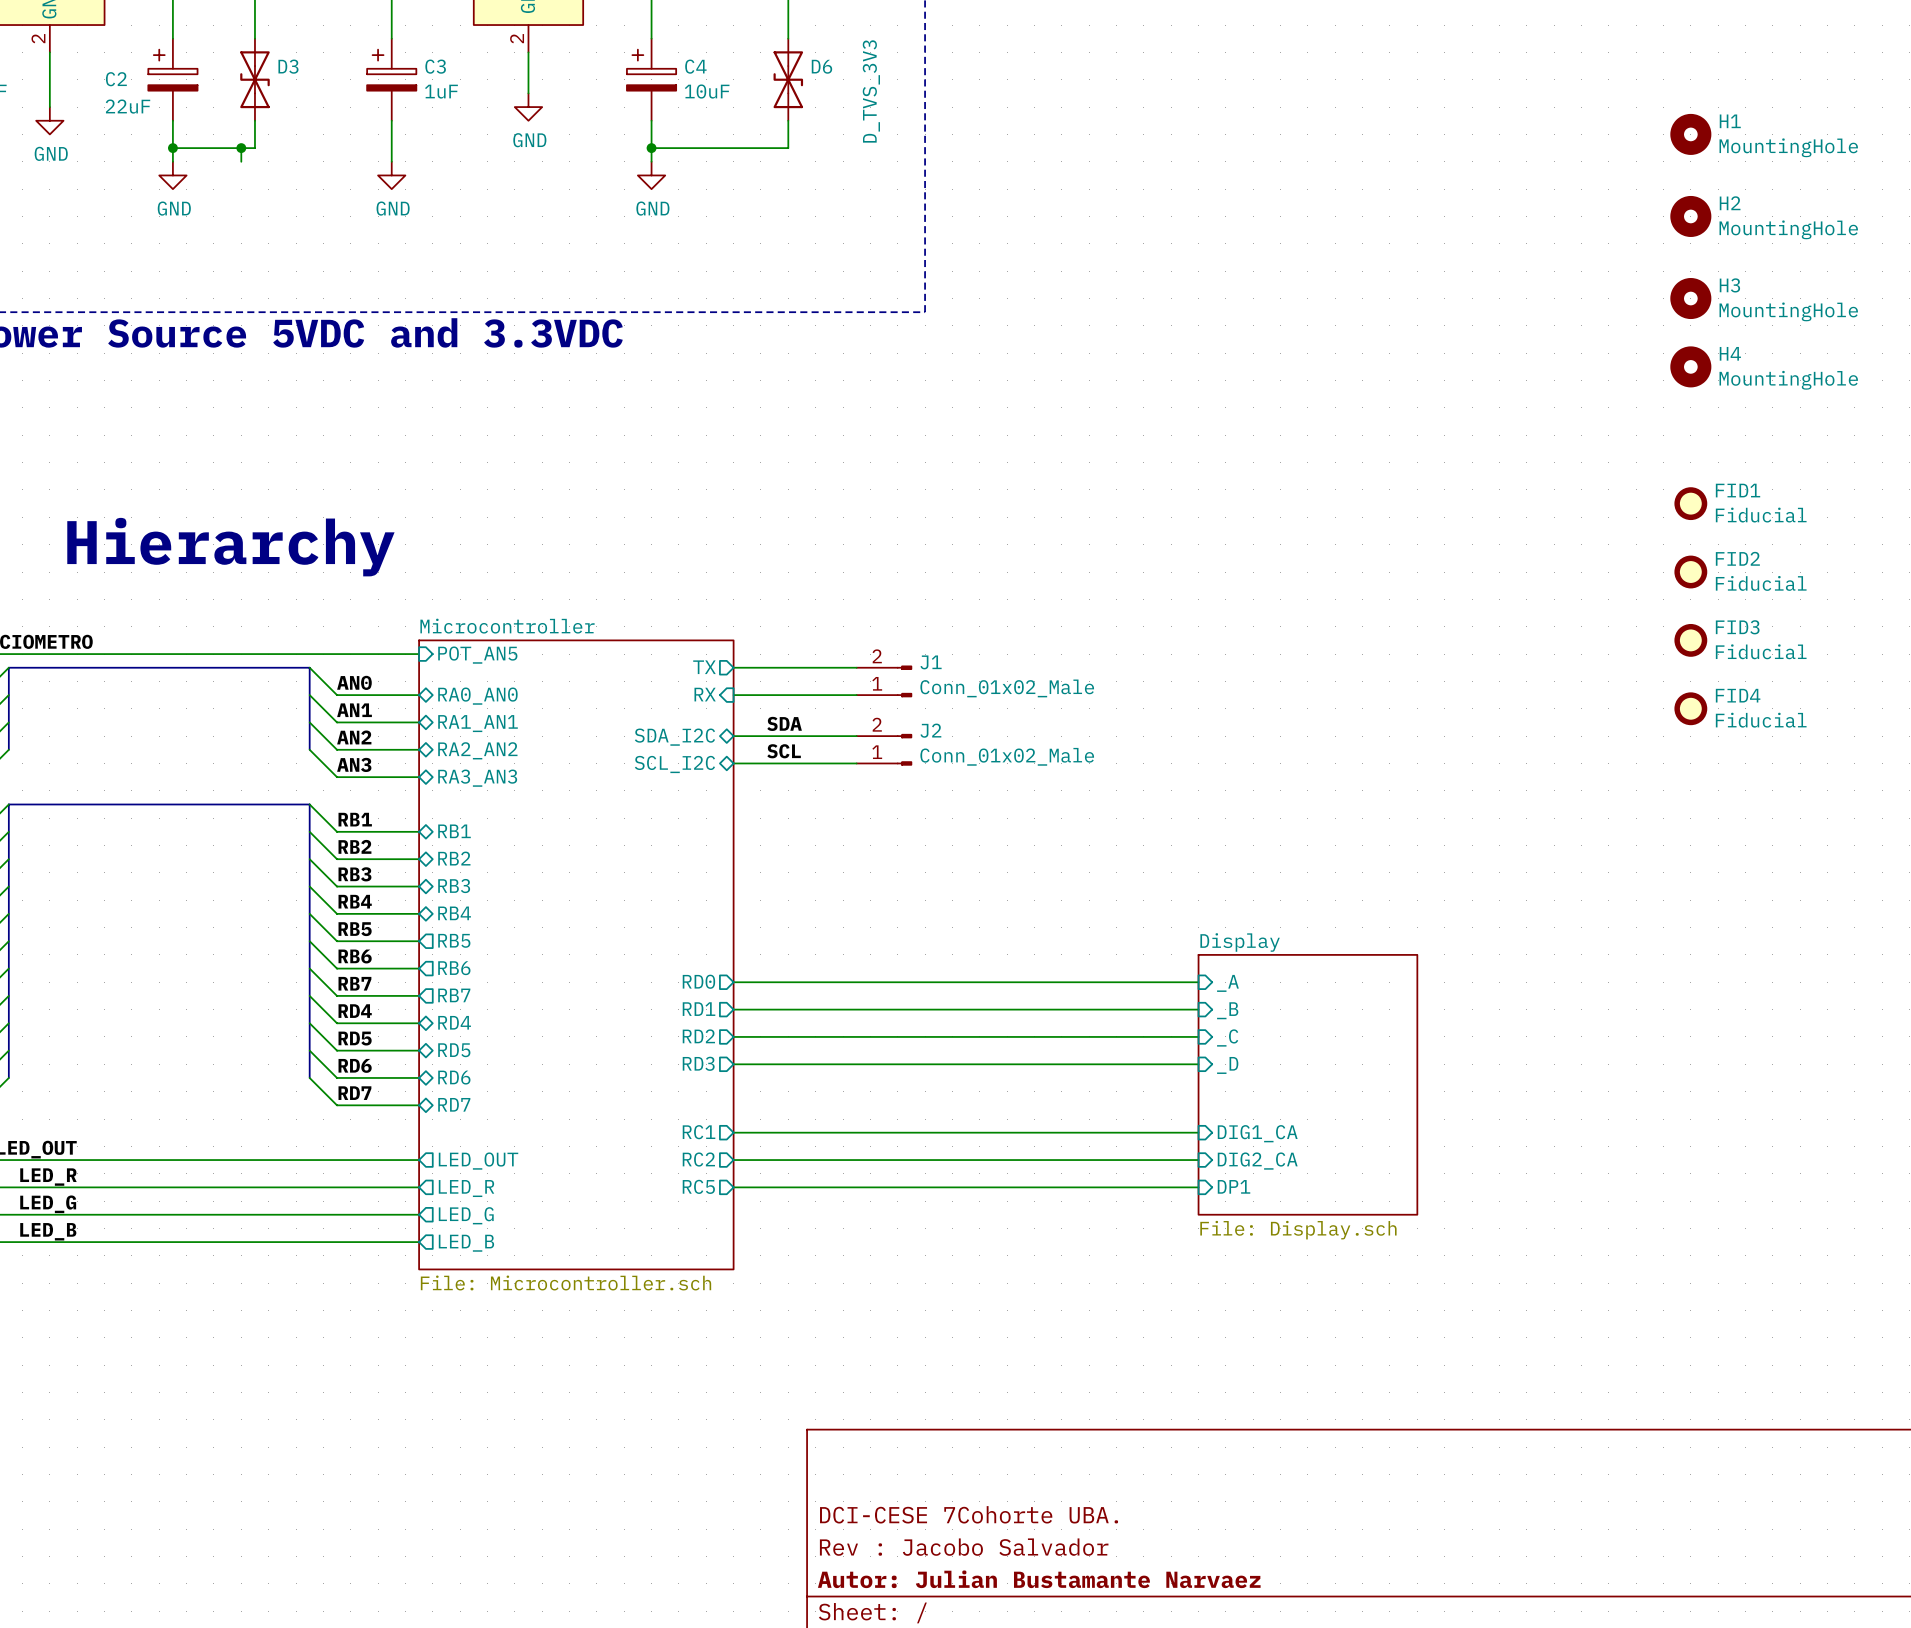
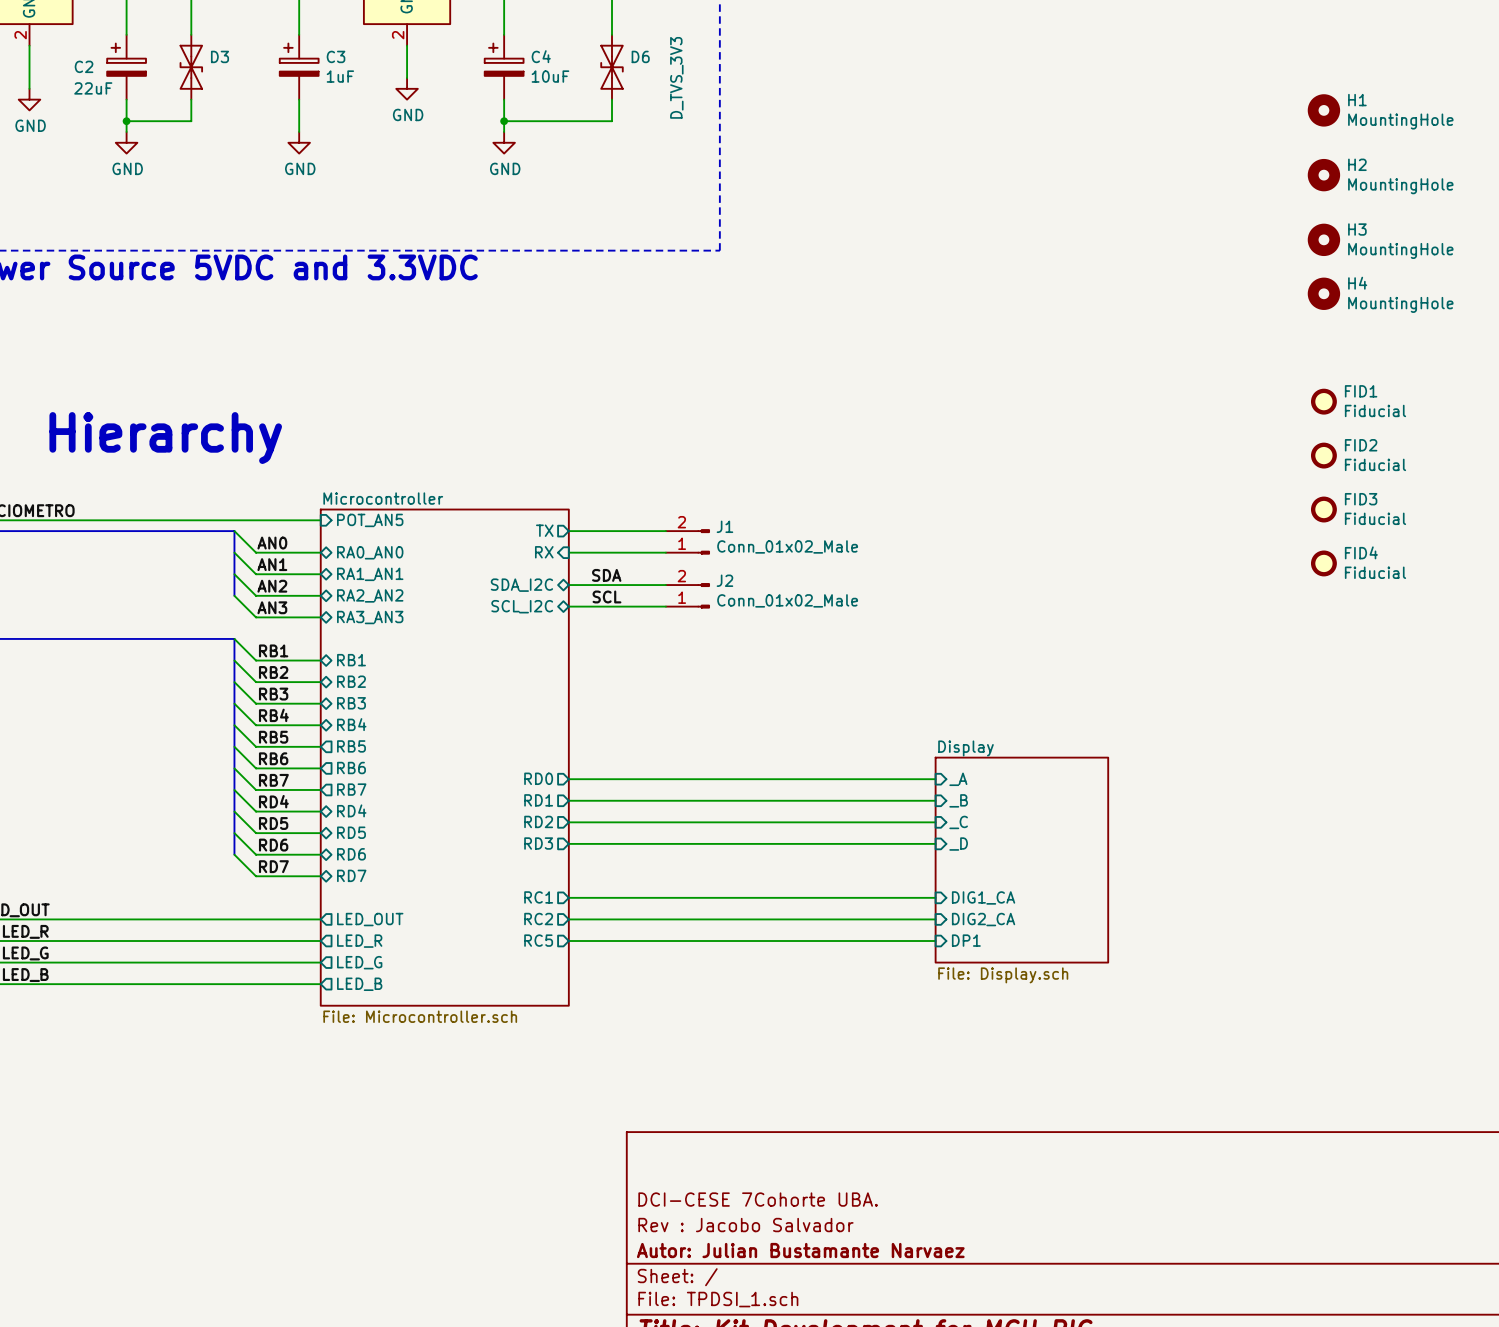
wire: (241, 148) (241, 161) -> none
junction: (241, 148) -> none

